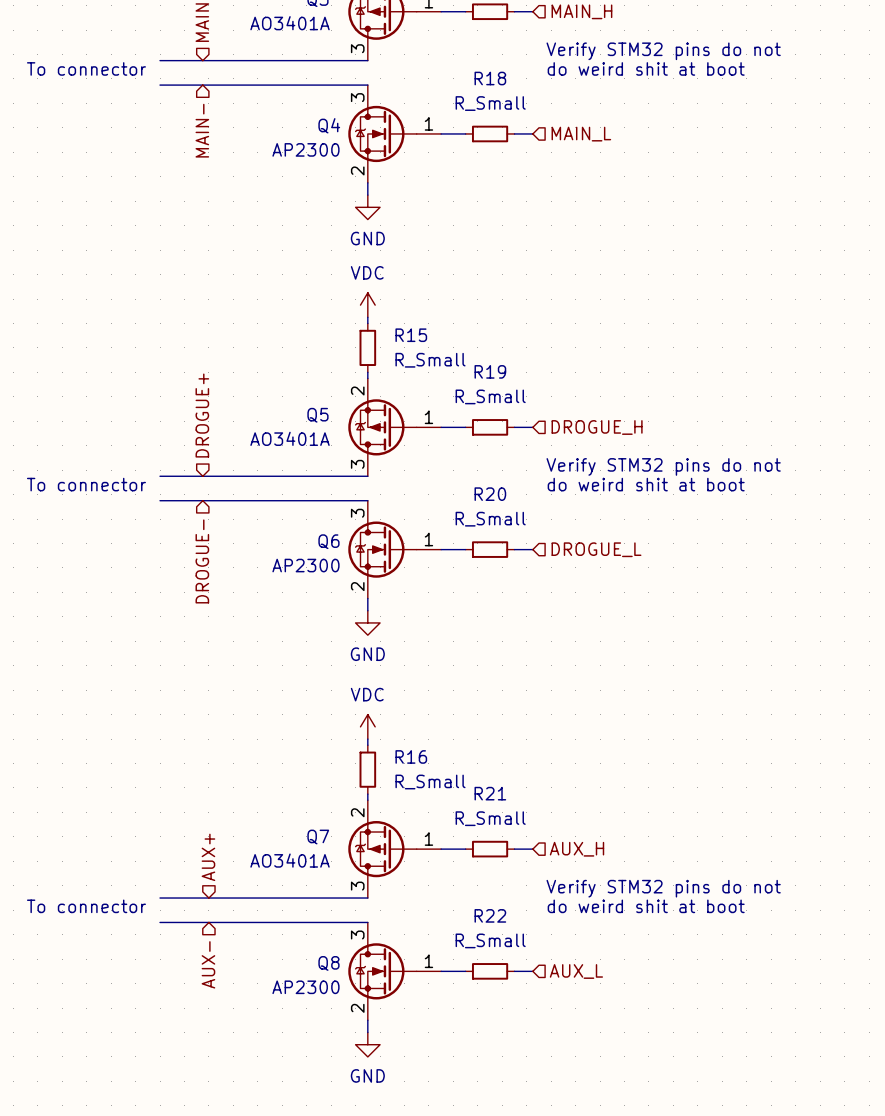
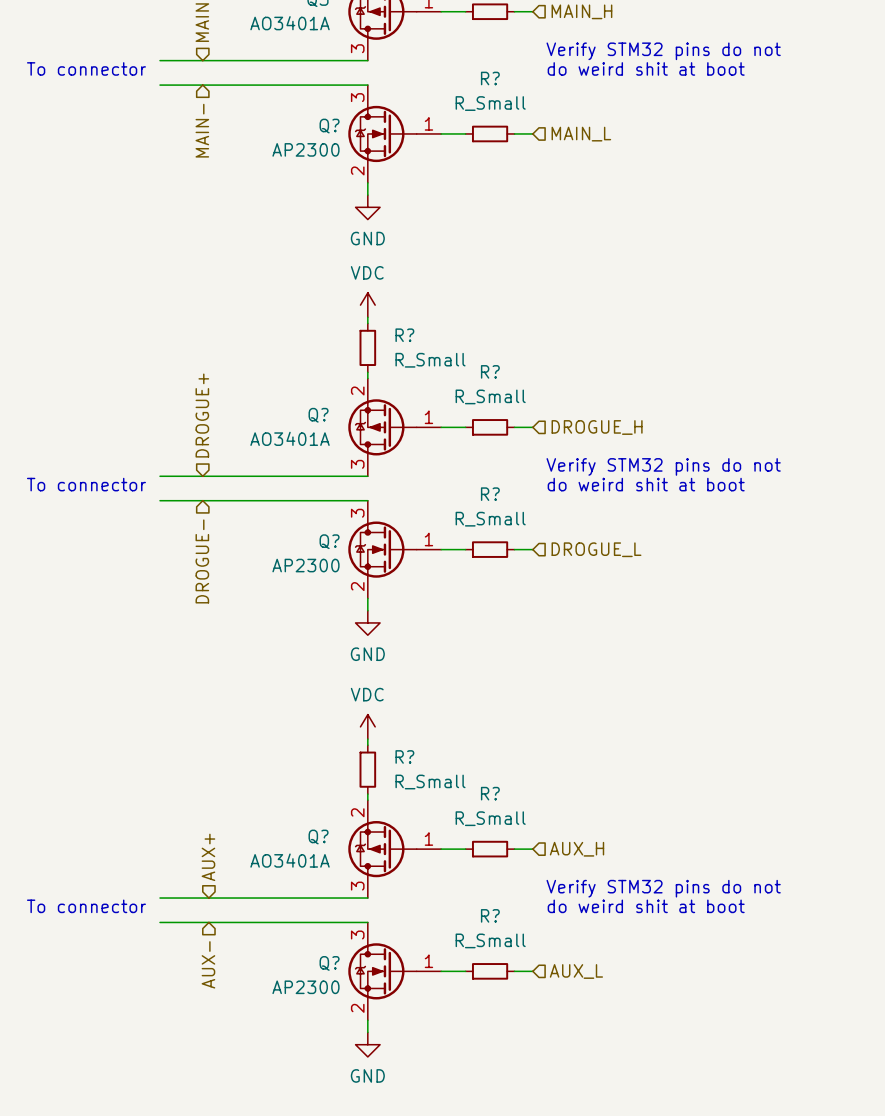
R18 name: R18 (490, 78) -> R? (490, 78)
Q4 name: Q4 (329, 125) -> Q? (329, 126)
R15 name: R15 (411, 335) -> R? (404, 335)
R19 name: R19 (490, 371) -> R? (490, 371)
Q5 name: Q5 (317, 415) -> Q? (318, 415)
R20 name: R20 (490, 494) -> R? (490, 494)
Q6 name: Q6 (328, 541) -> Q? (329, 541)
R16 name: R16 (411, 756) -> R? (404, 756)
R21 name: R21 (490, 793) -> R? (490, 793)
Q7 name: Q7 (318, 837) -> Q? (318, 837)
R22 name: R22 (490, 915) -> R? (490, 915)
Q8 name: Q8 (328, 963) -> Q? (329, 963)

